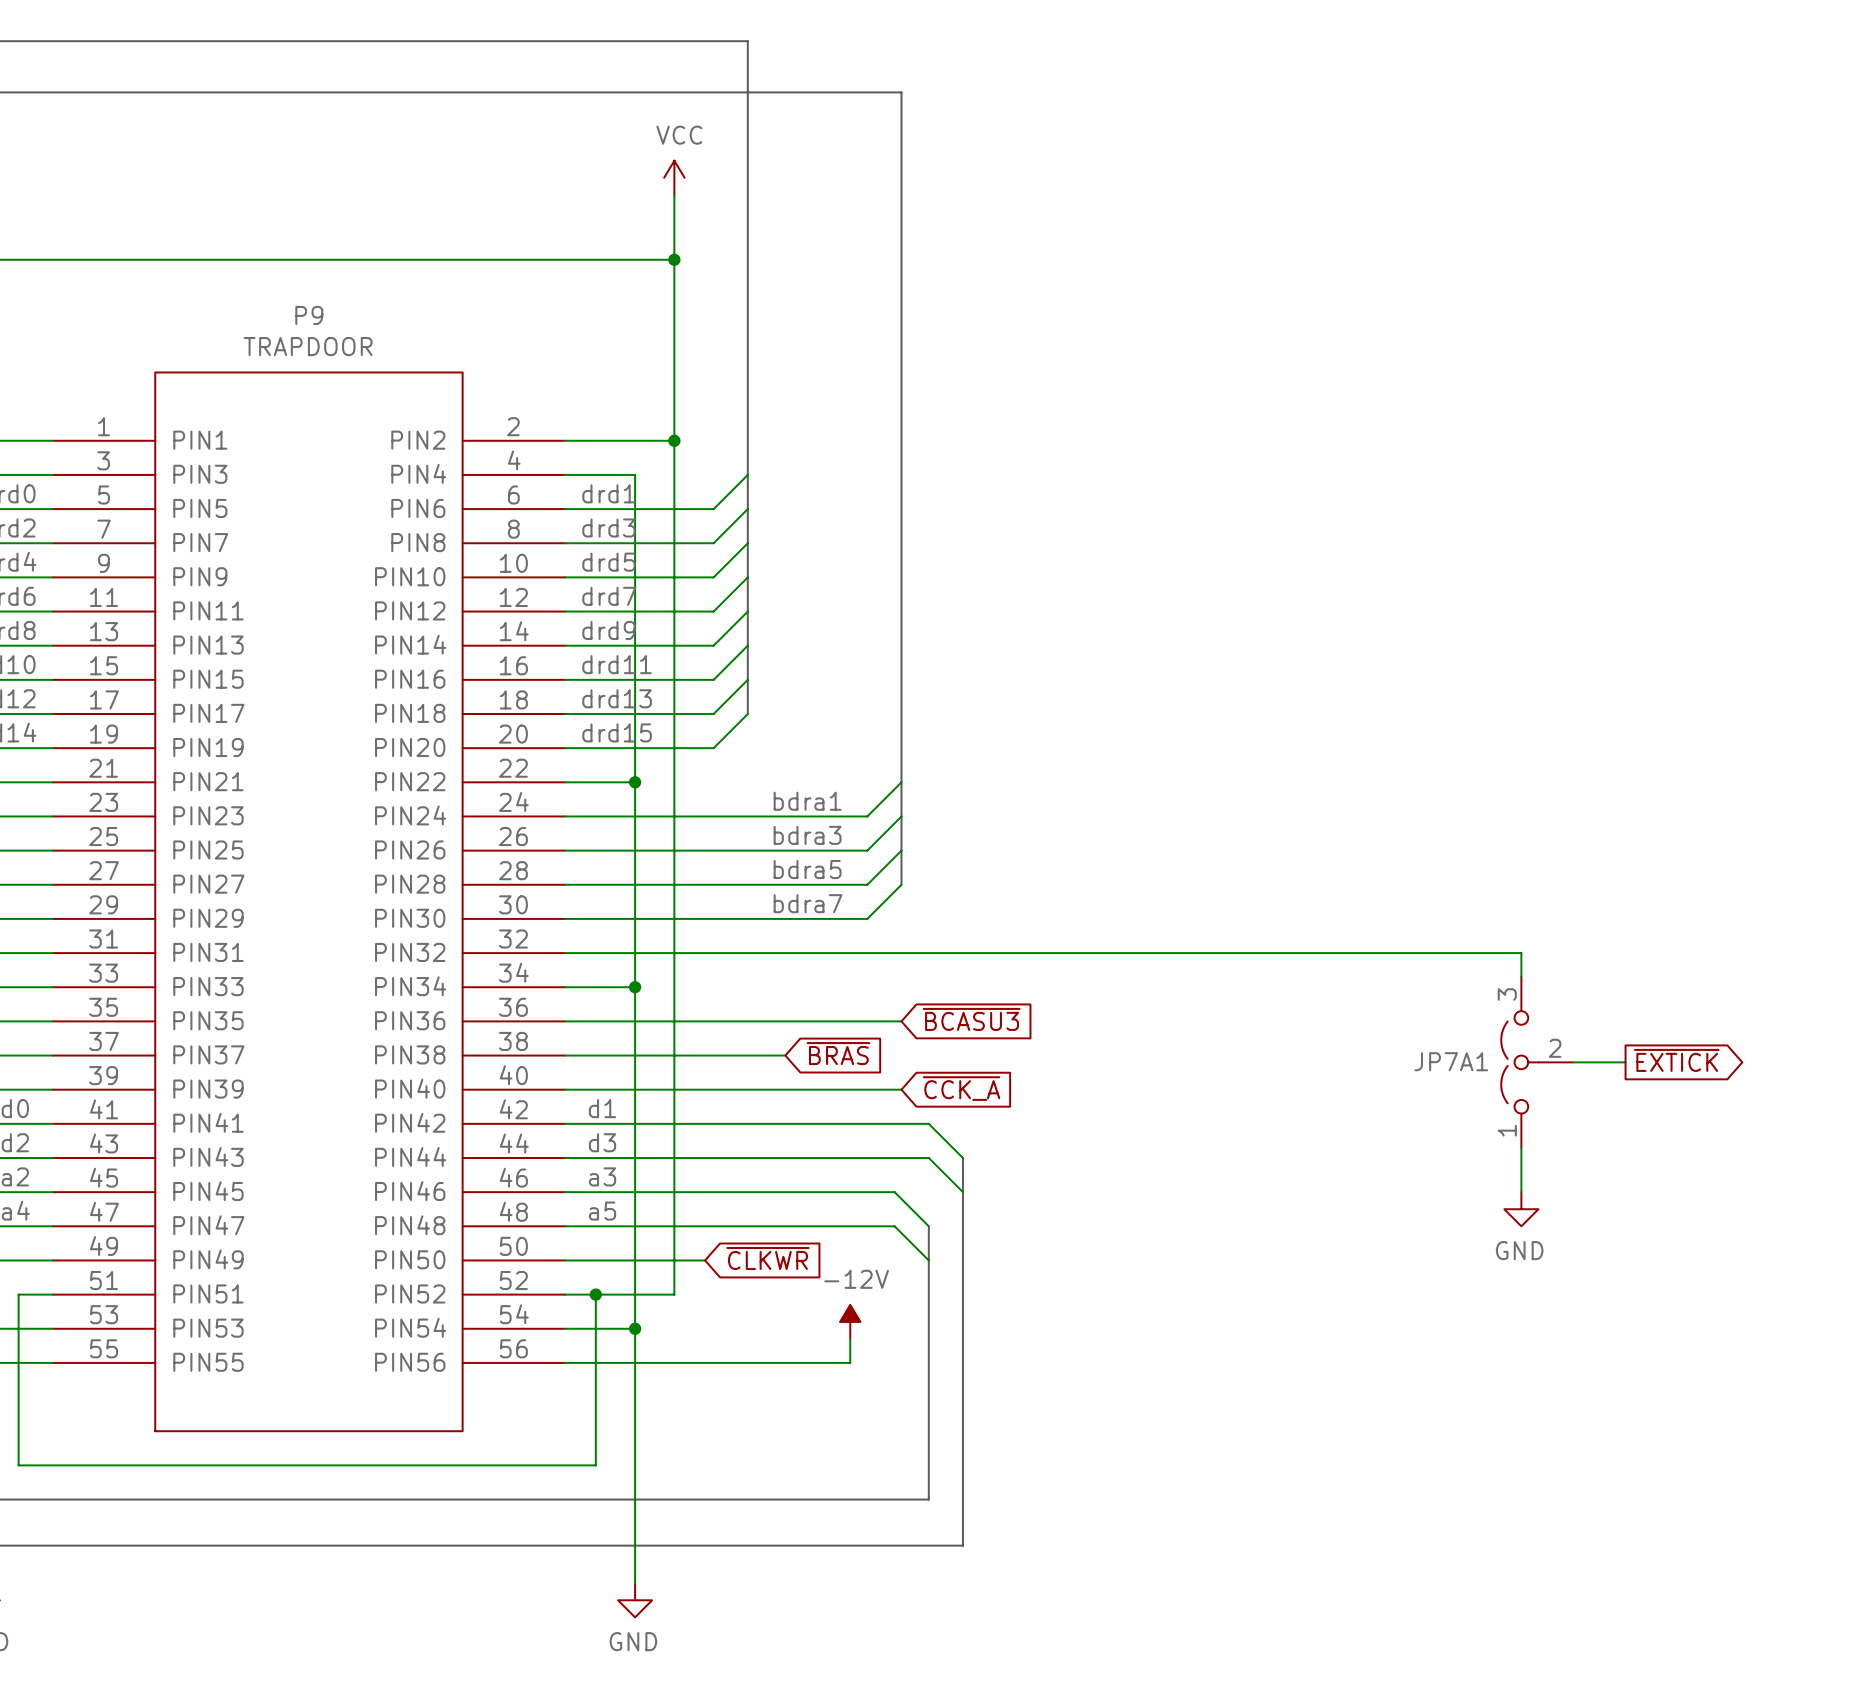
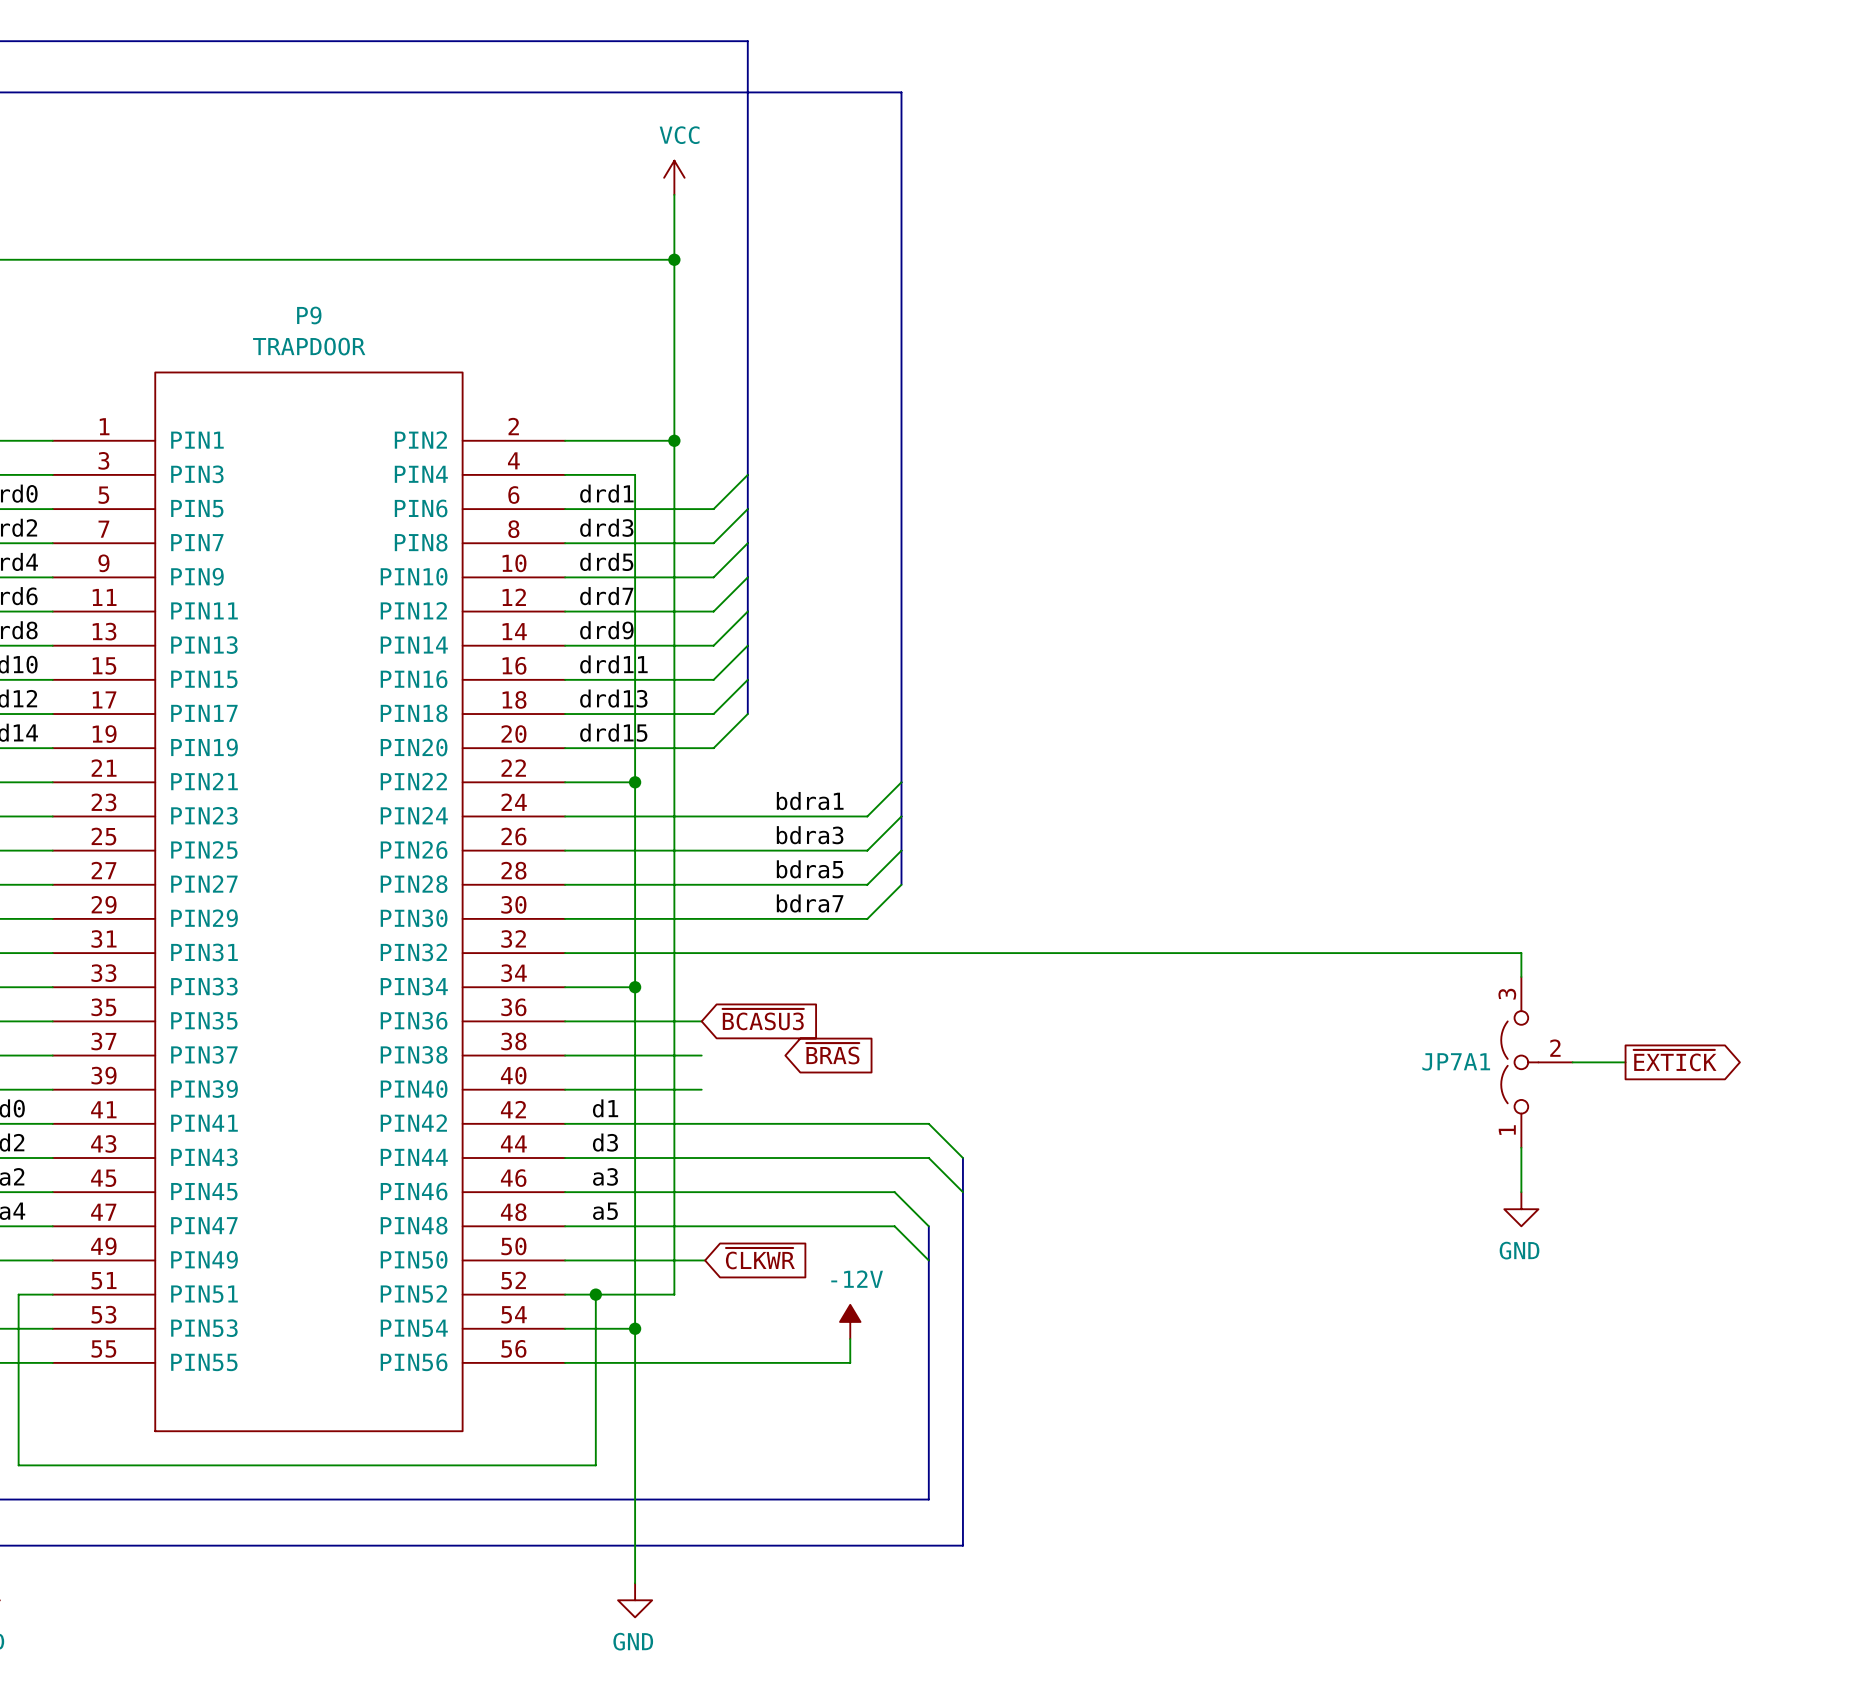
global label position: ~{BCASU3} (971, 1019) -> ~{BCASU3} (763, 1019)
wire: (701, 1021) (901, 1021) -> none
wire: (701, 1055) (785, 1055) -> none
global label: ~{CCK_A} (961, 1088) -> none
wire: (701, 1089) (901, 1089) -> none

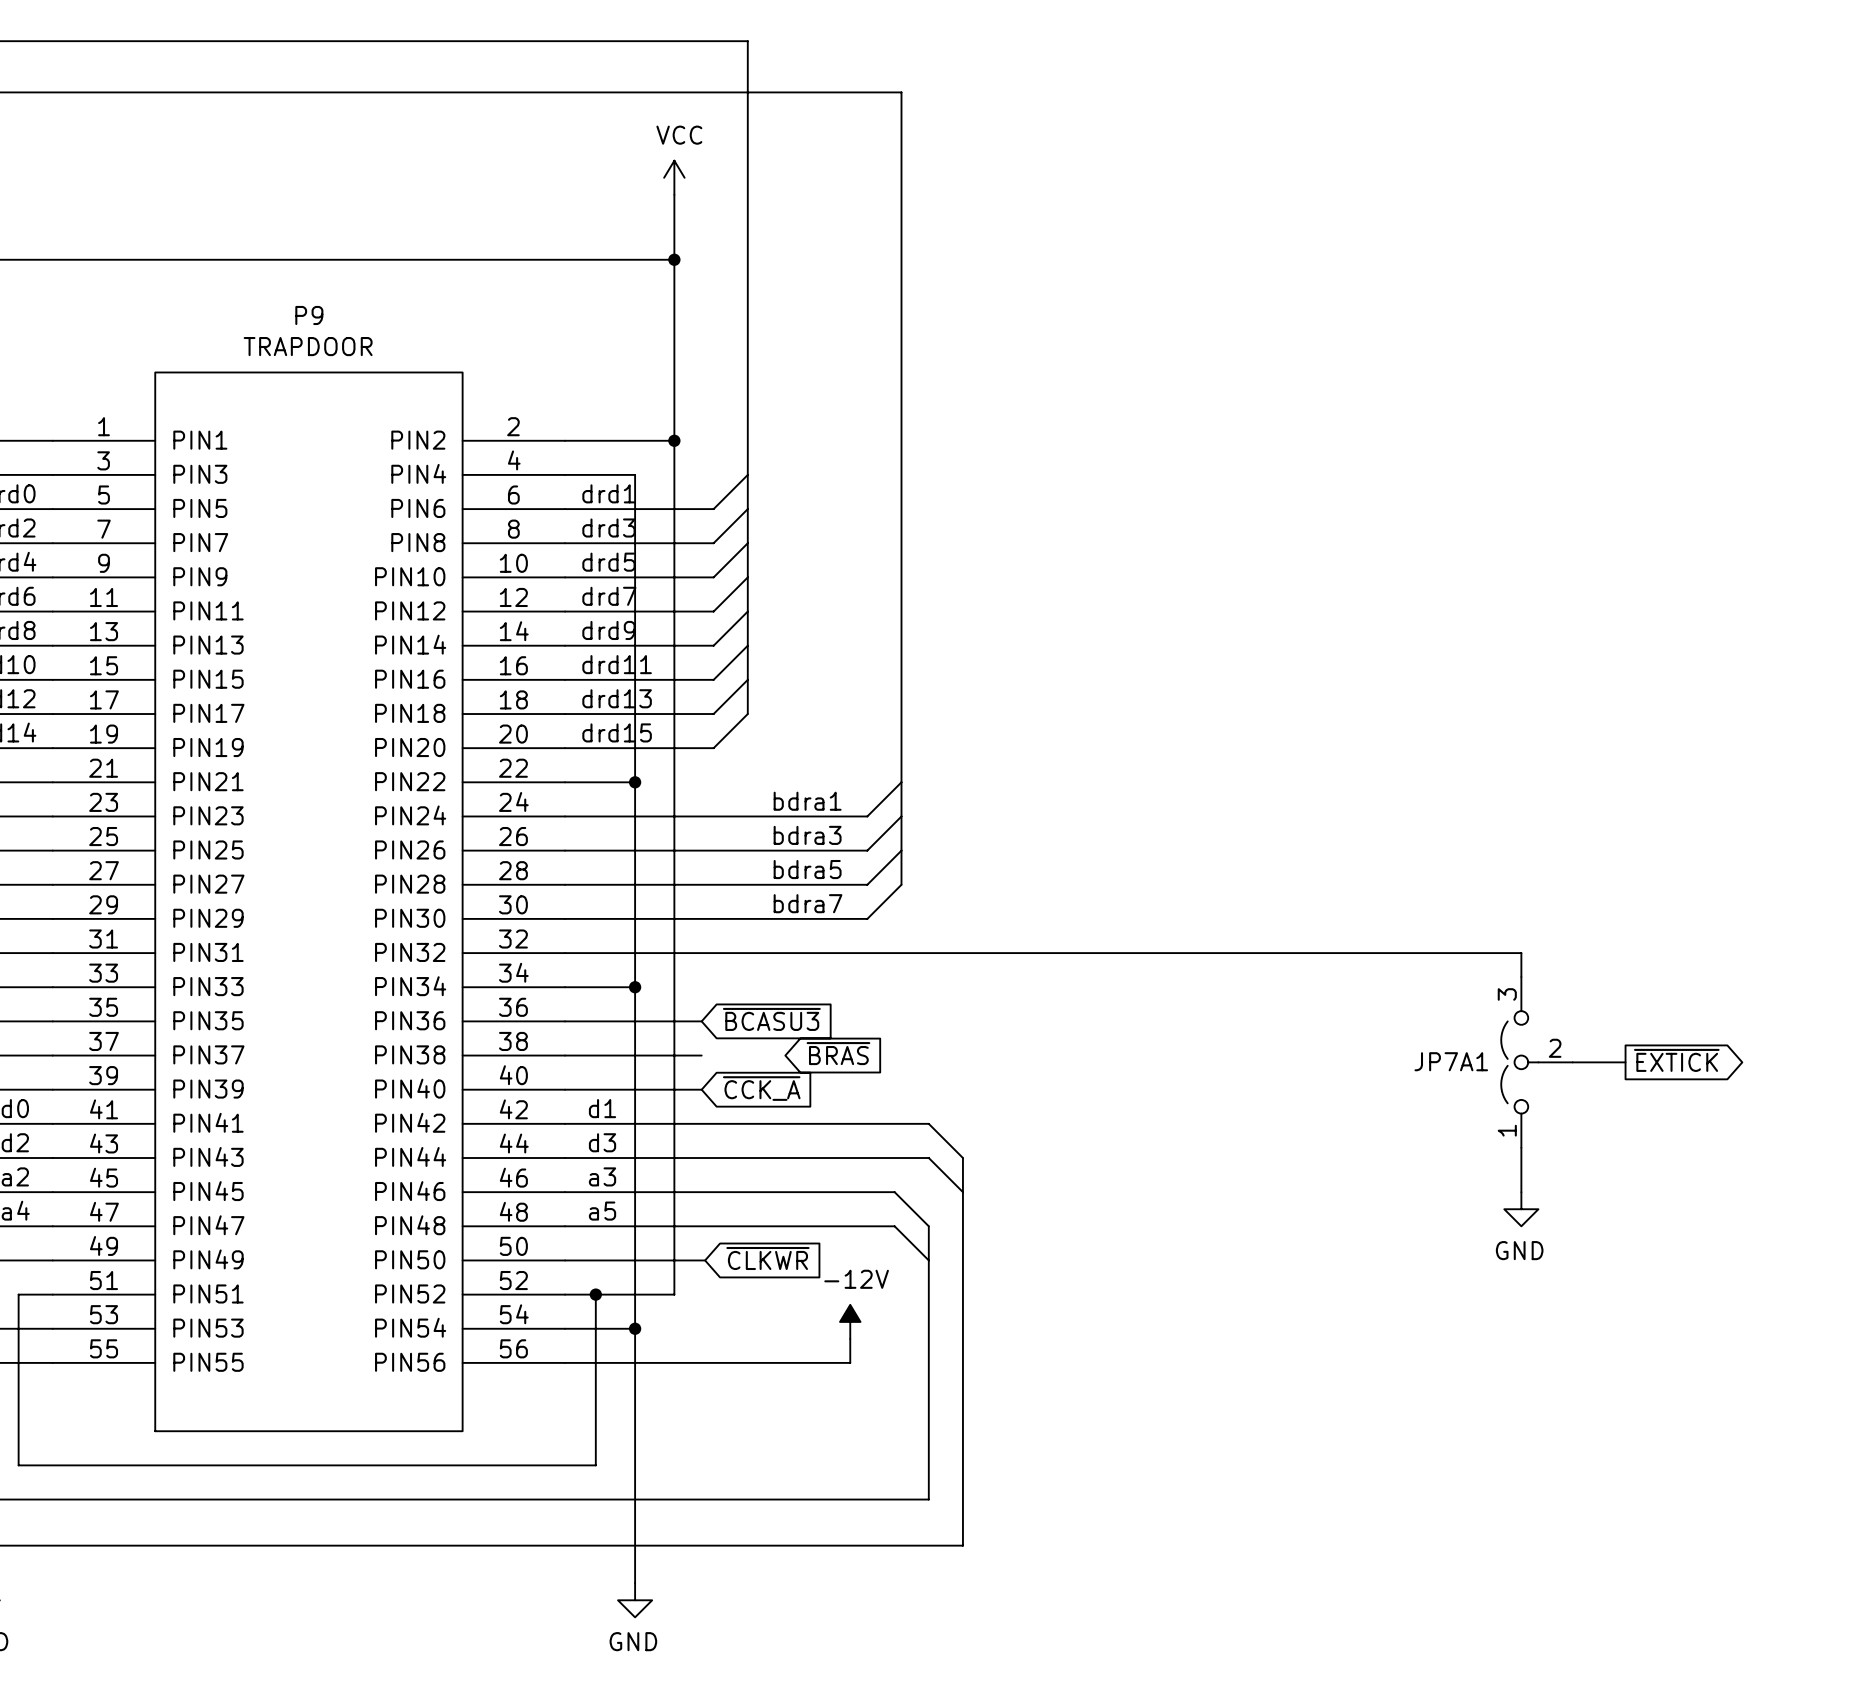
global label: none -> ~{CCK_A} (761, 1088)

